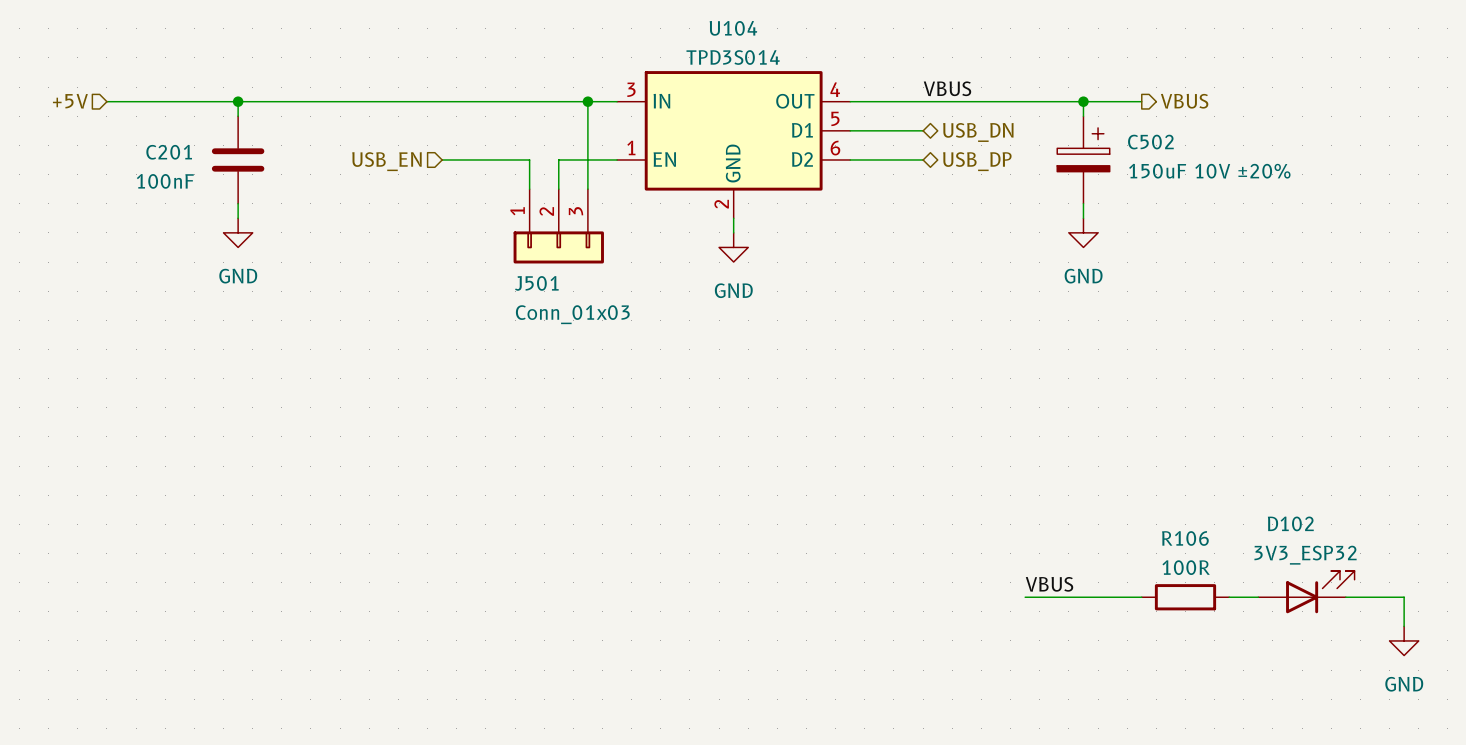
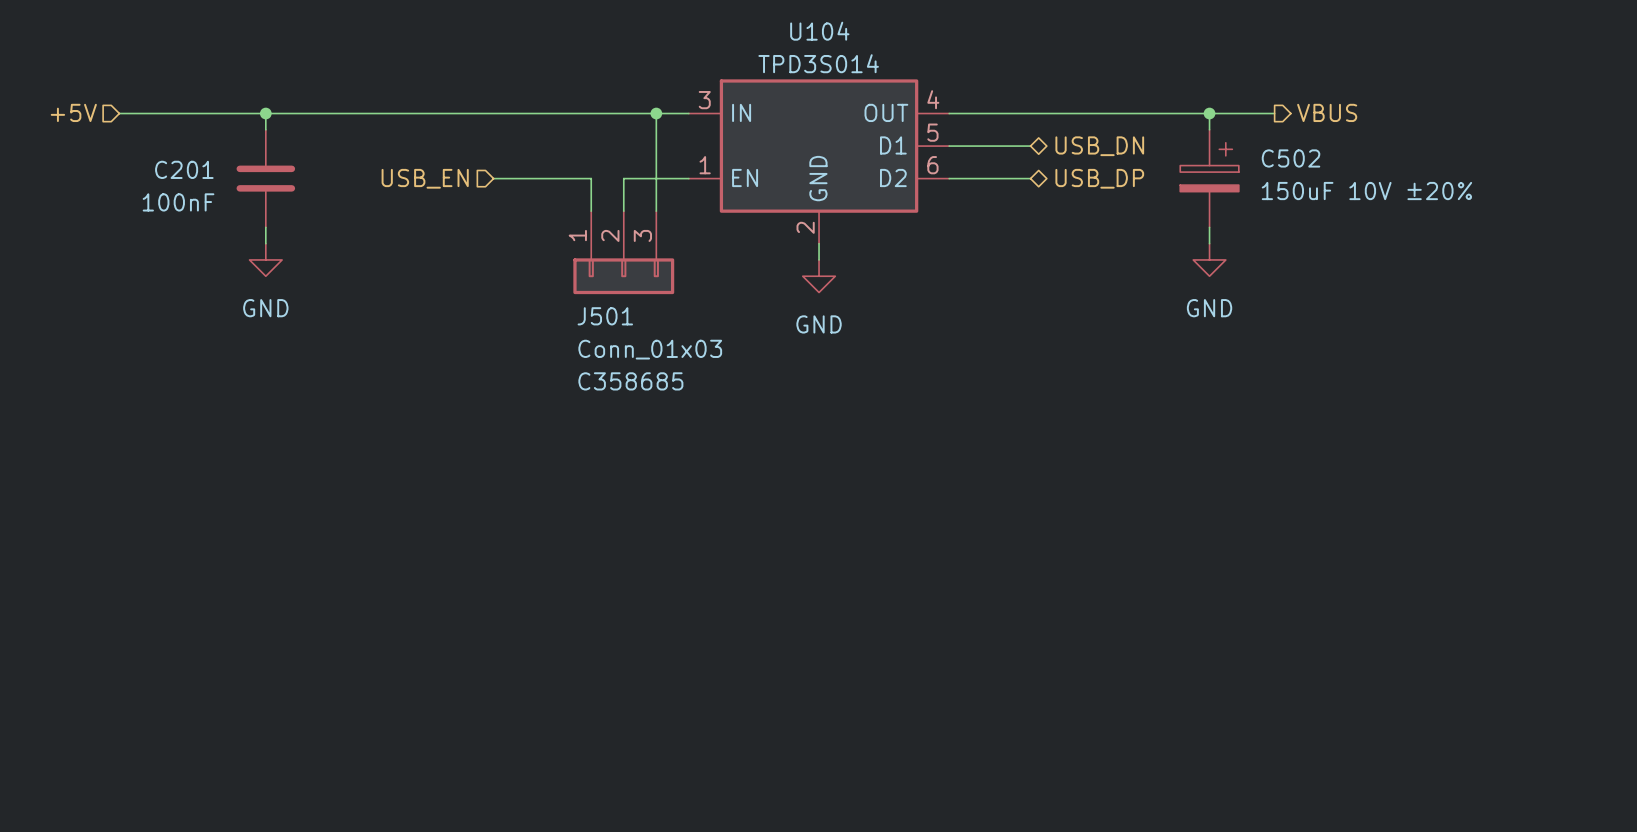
label: VBUS (947, 88) -> none
J501 text: none -> C358685 (630, 381)
label: VBUS (1049, 584) -> none
D102: 3V3_ESP32 (1306, 592) -> none
wire: (1025, 597) (1141, 597) -> none
R106: 100R (1185, 597) -> none
wire: (1229, 597) (1258, 597) -> none
wire: (1345, 597) (1404, 597) (1404, 626) -> none
power symbol: GND (1404, 640) -> none

